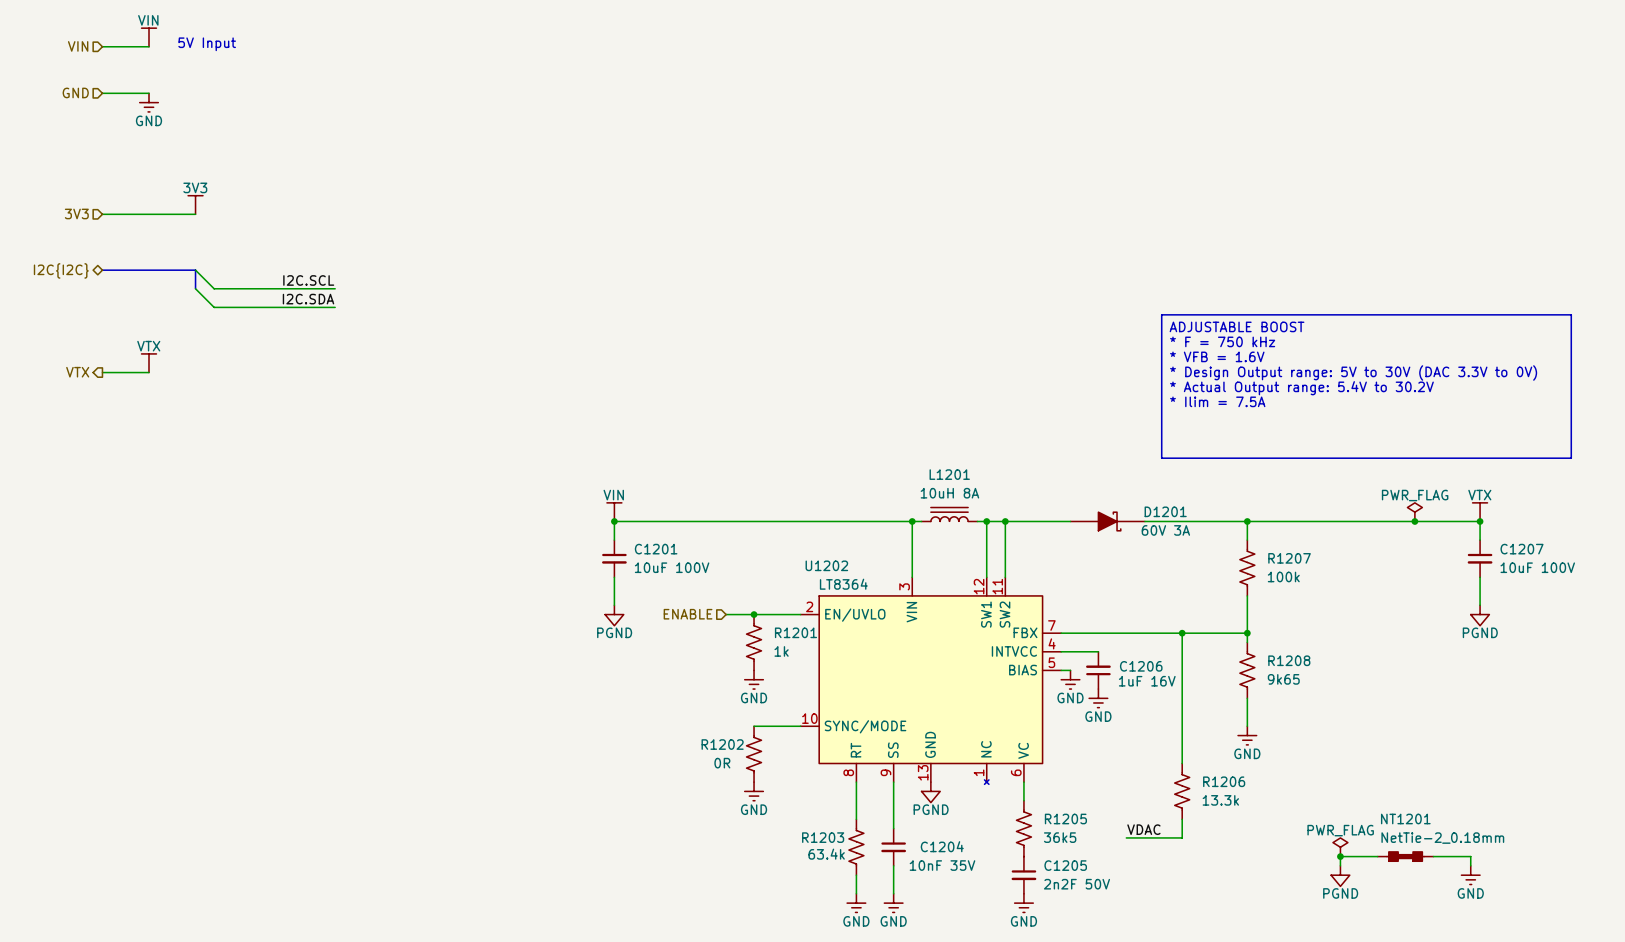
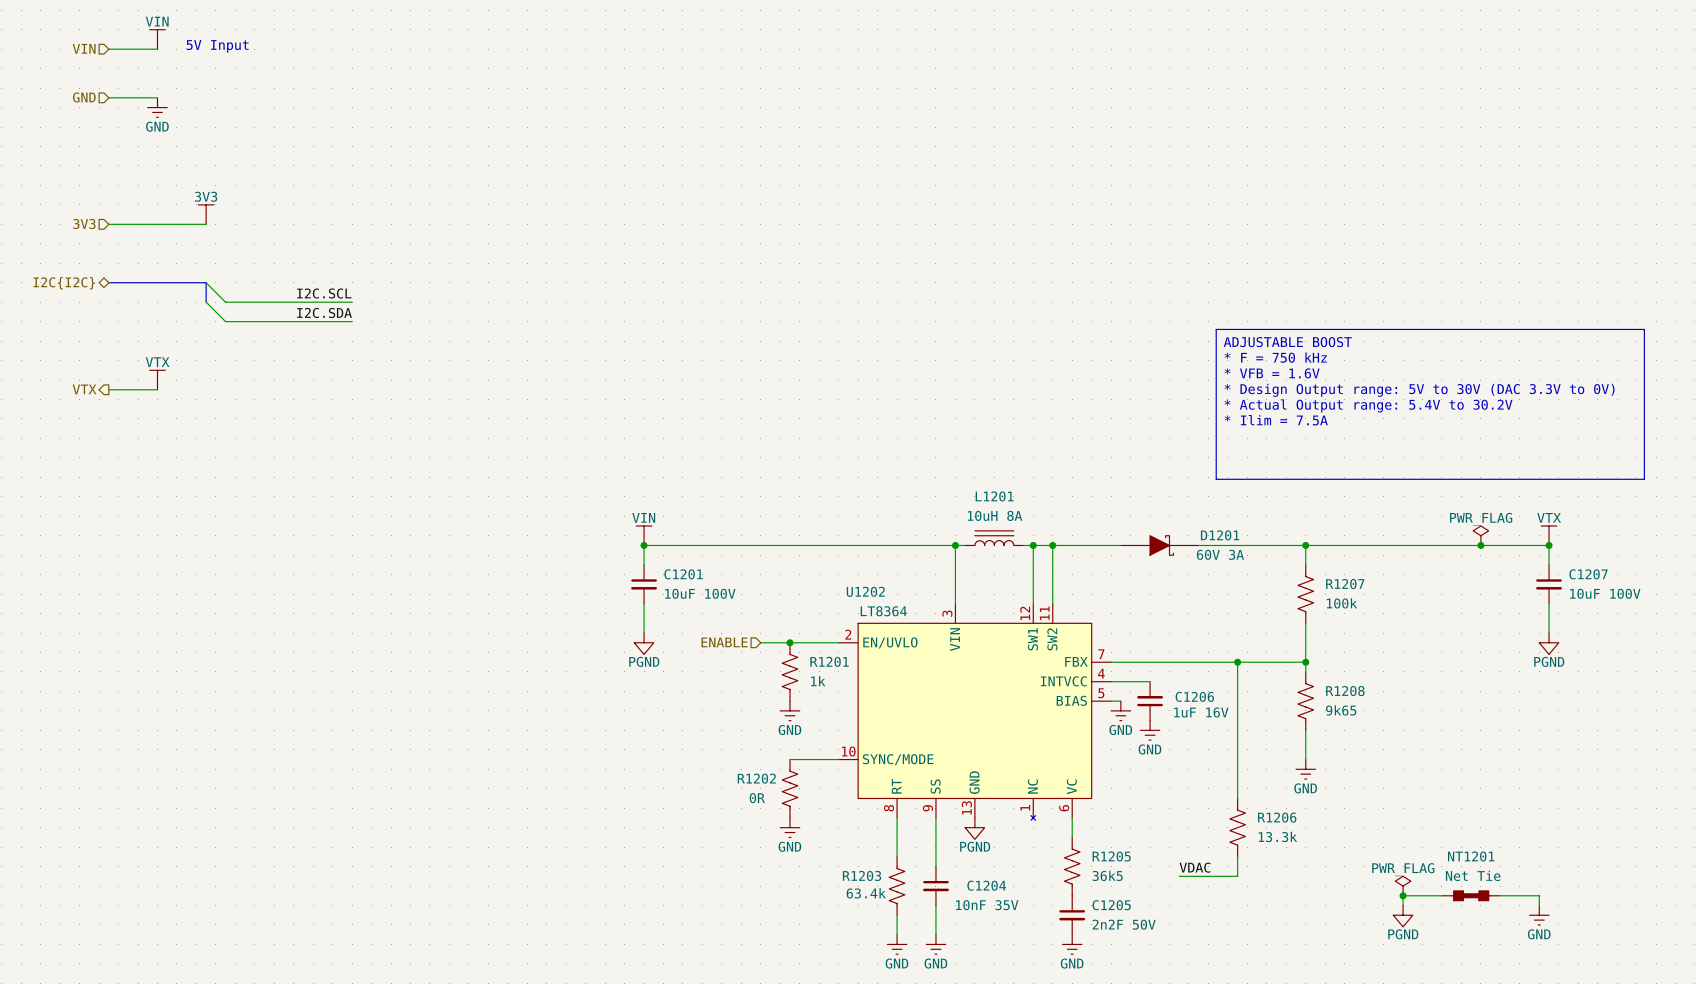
NT1201 value: NetTie-2_0.18mm (1442, 838) -> Net Tie (1473, 875)

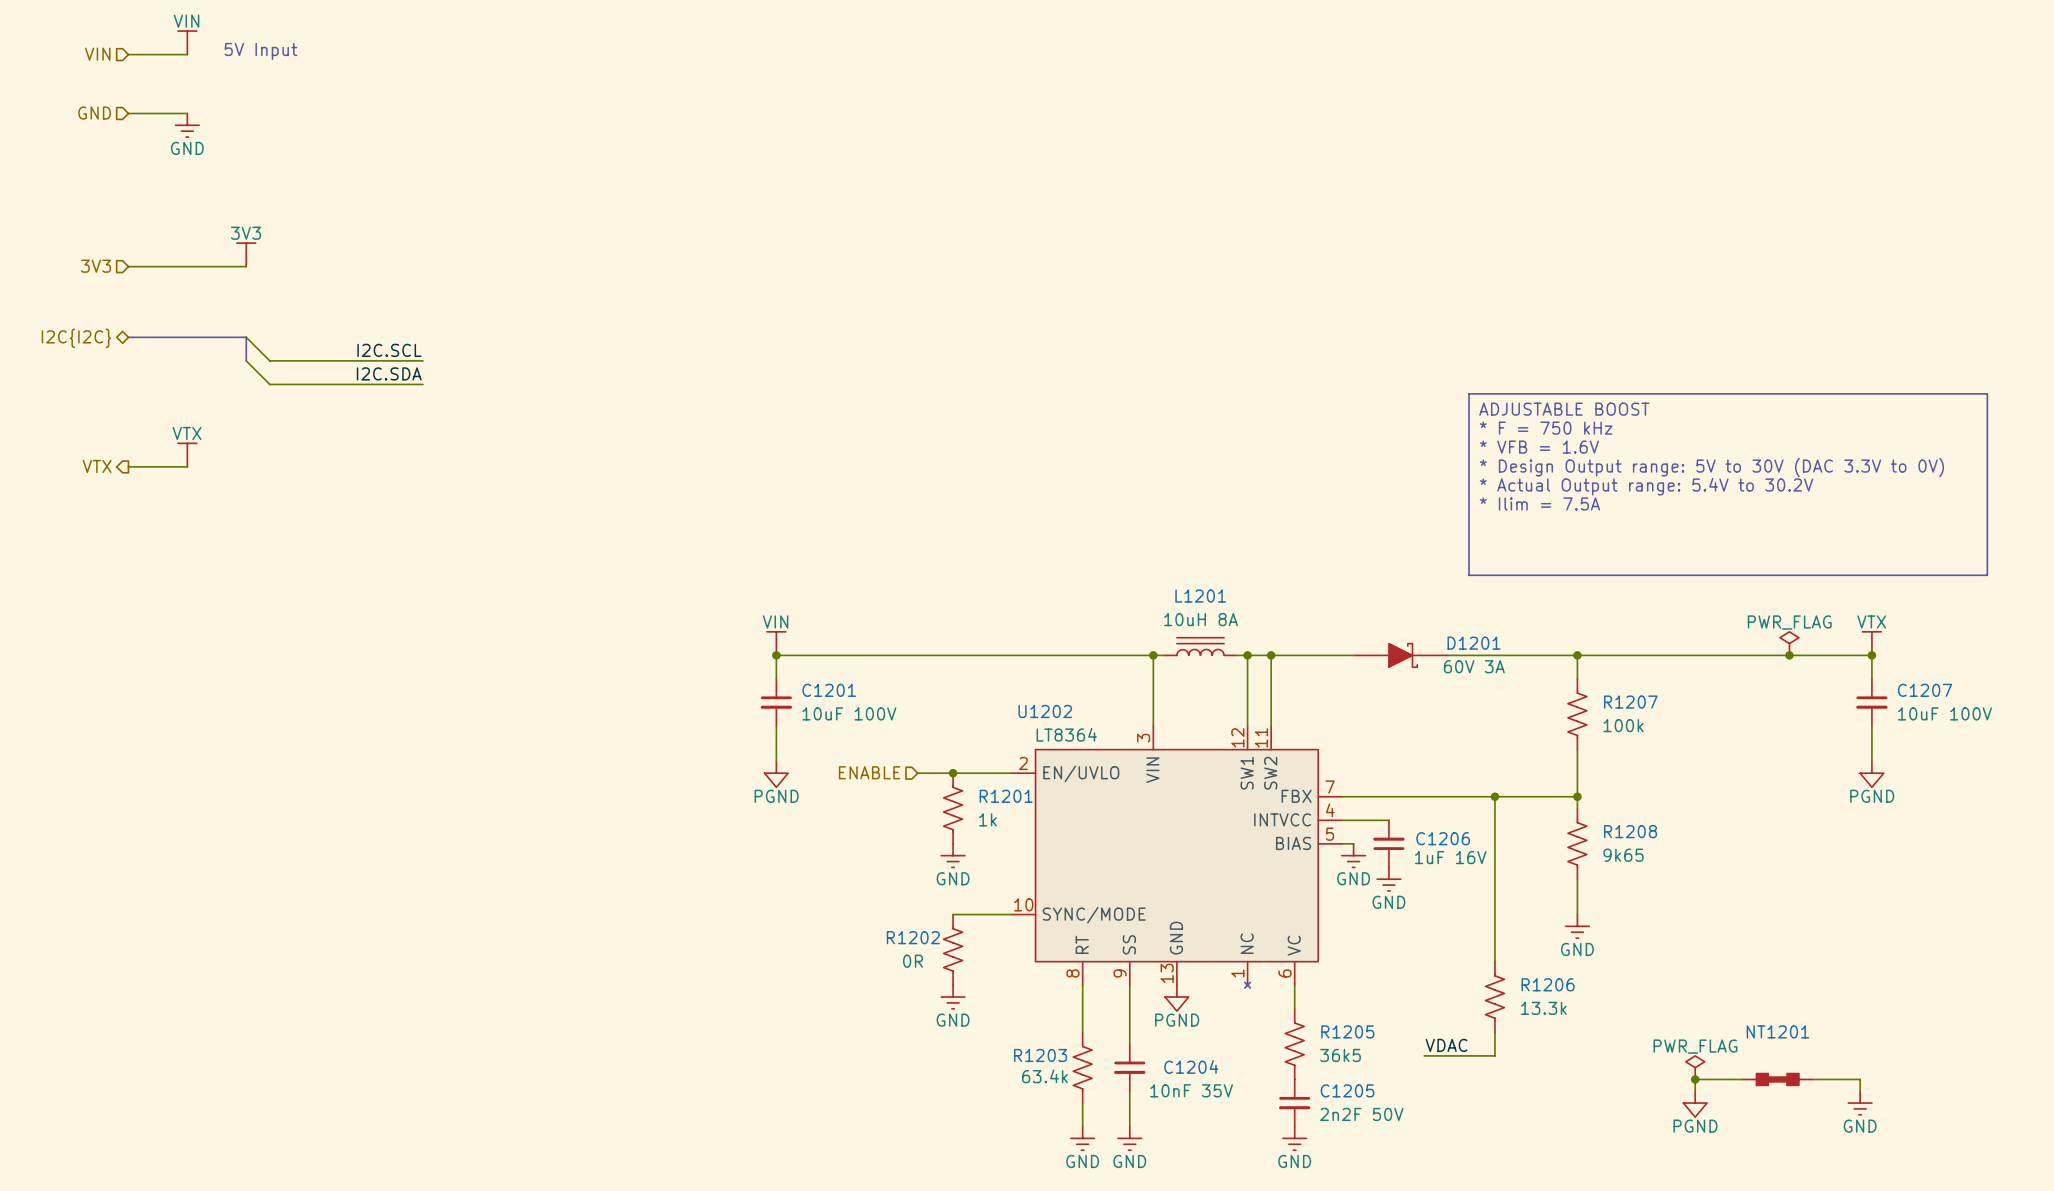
NT1201 value: Net Tie (1473, 875) -> none

